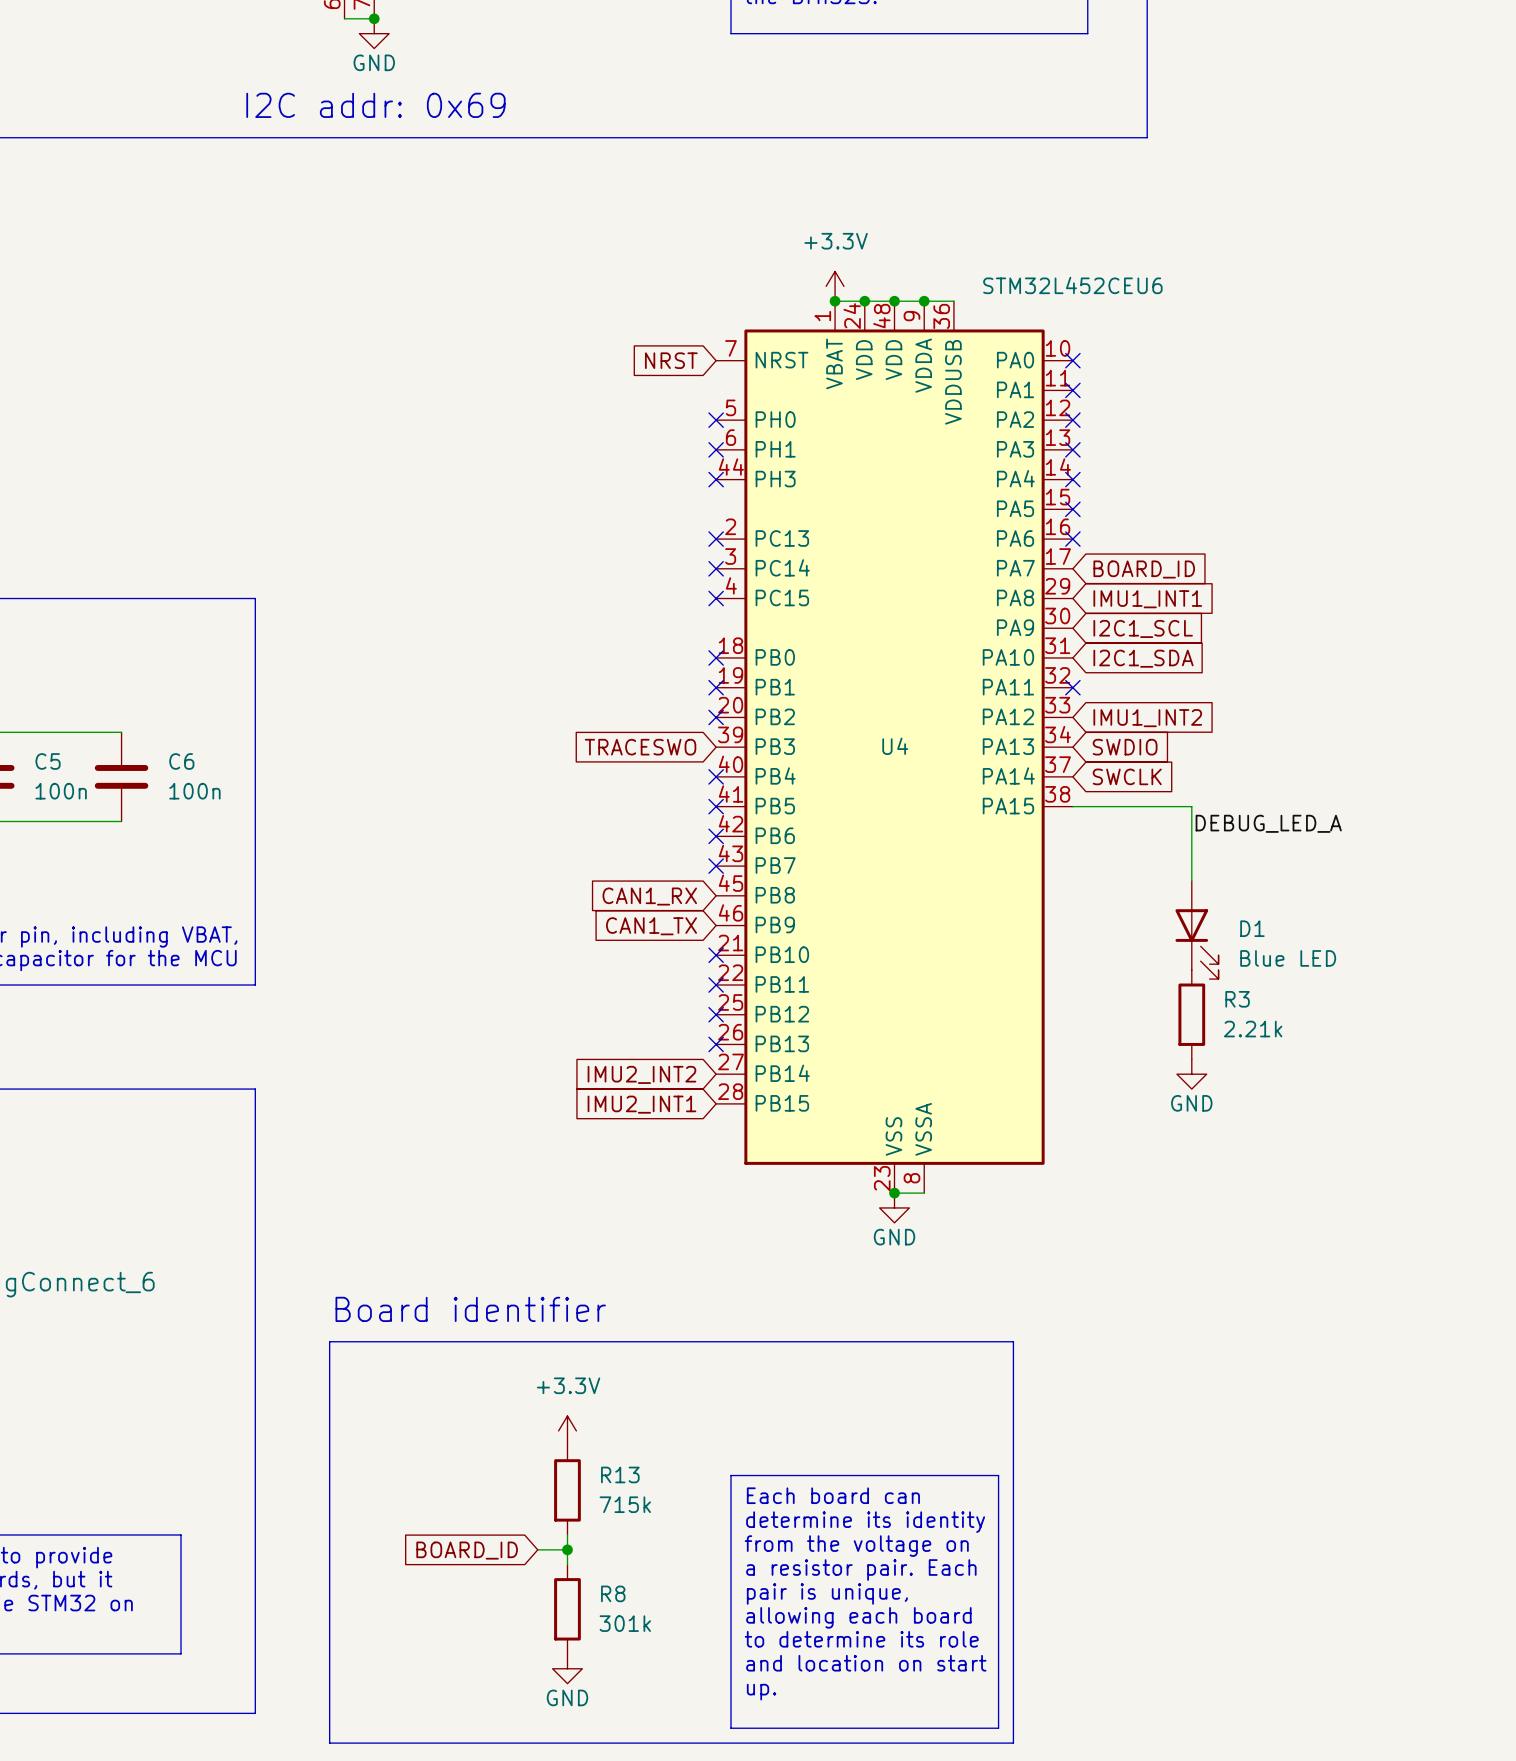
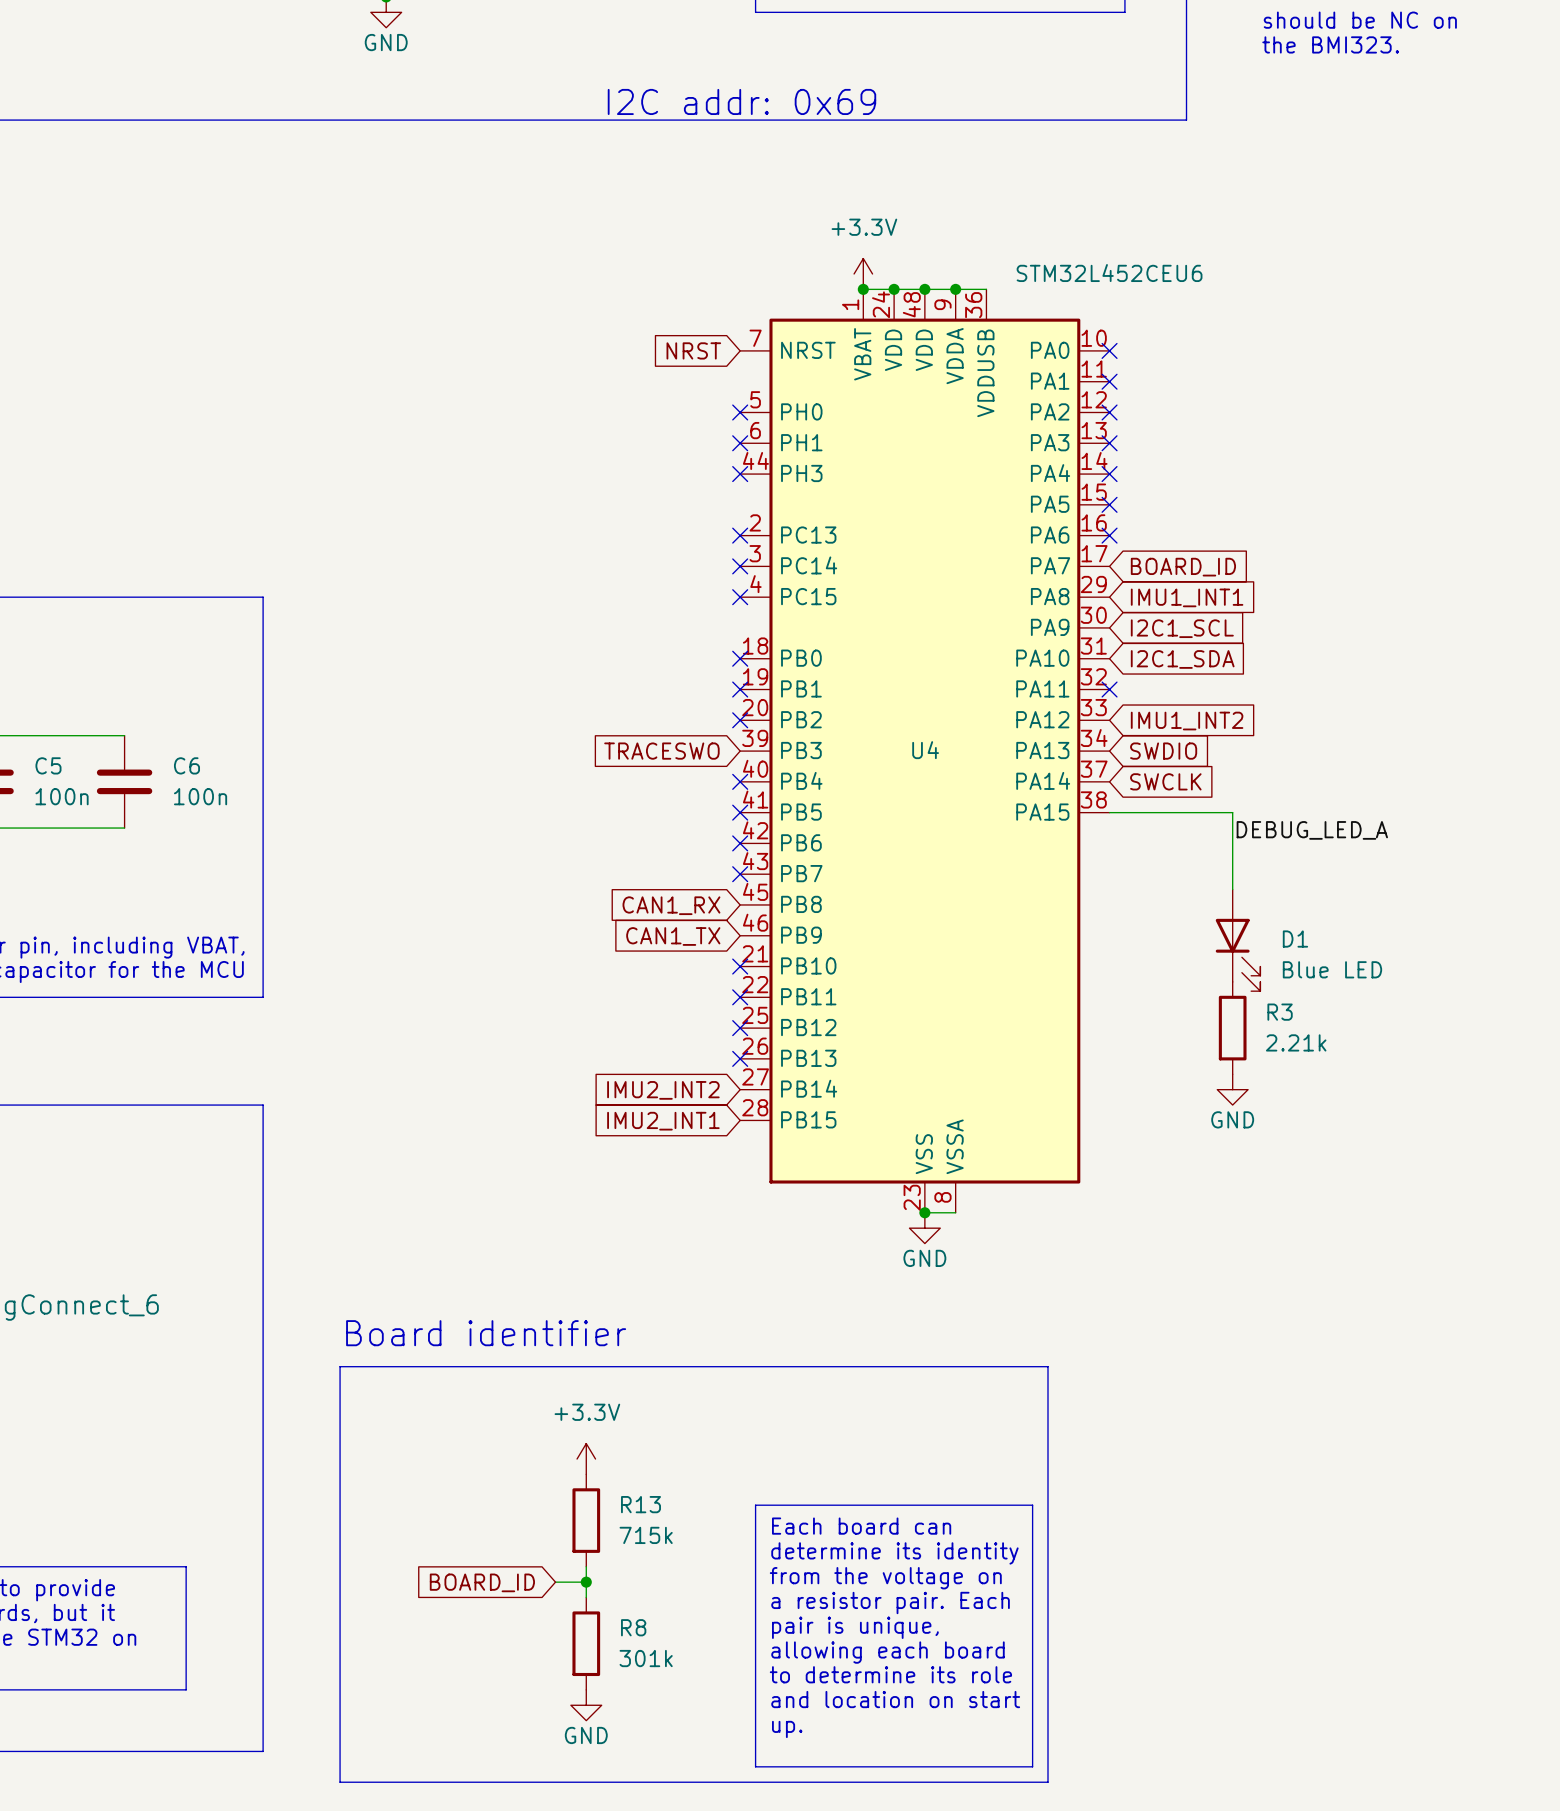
text: none -> should be NC on (1360, 20)
text: none -> the BMI323. (1330, 44)
text: I2C addr: 0x69 (375, 105) -> none
text: none -> I2C addr: 0x69 (741, 101)

